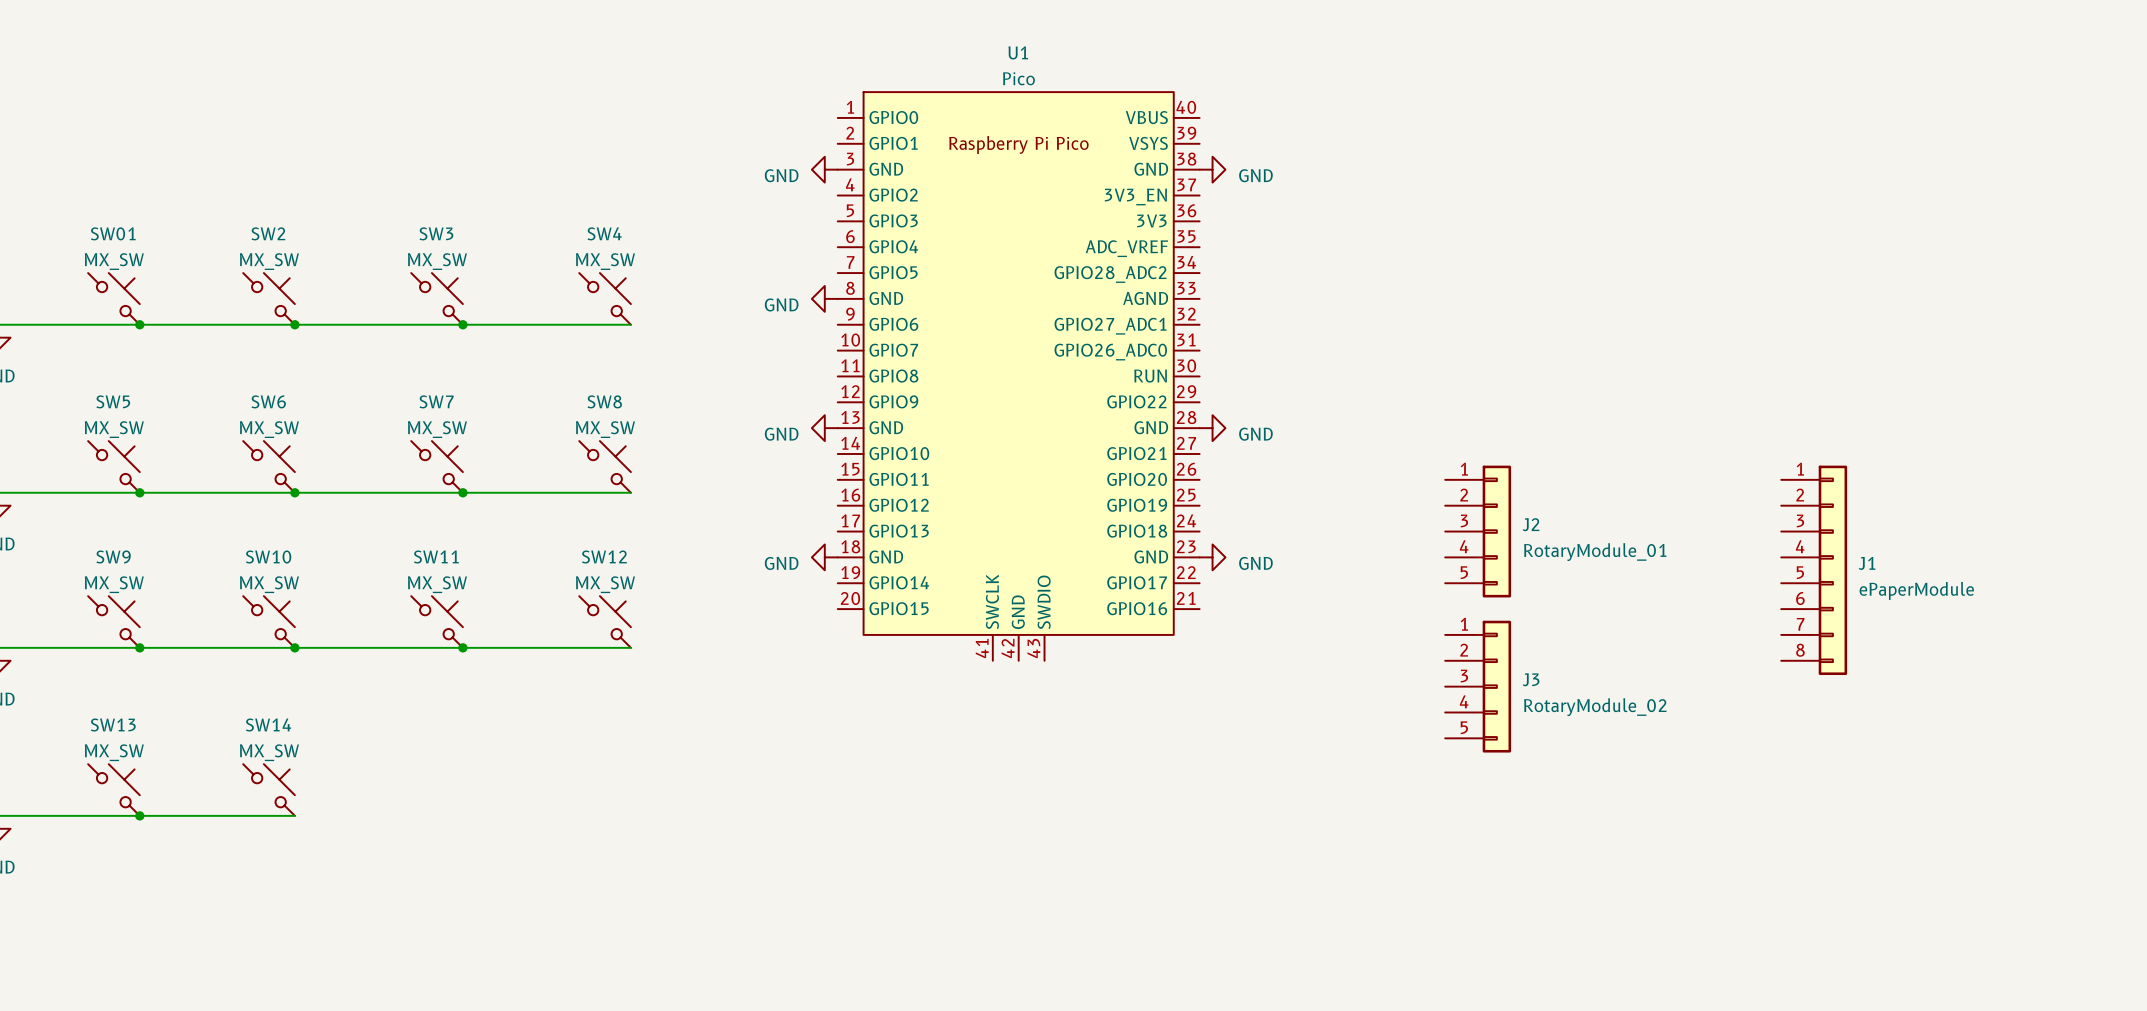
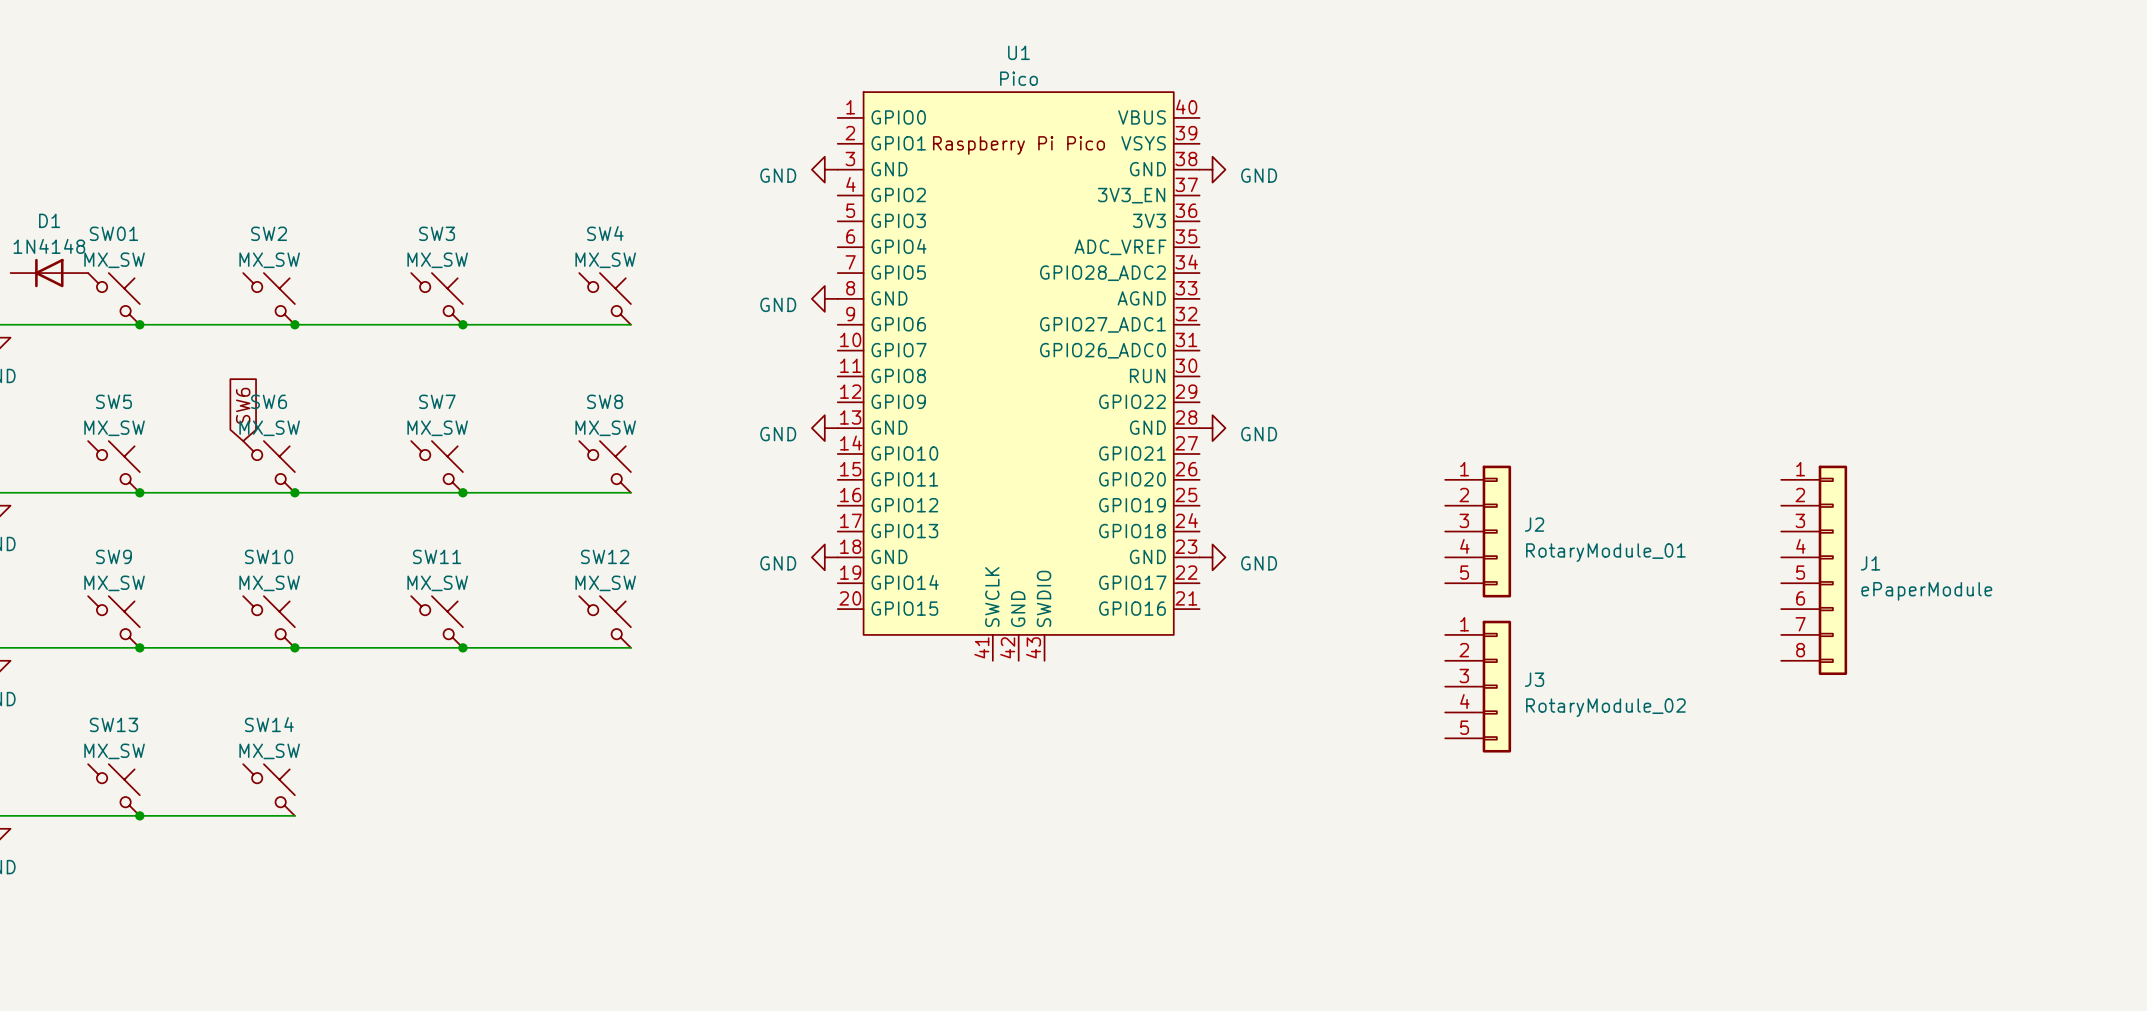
D1: none -> 1N4148 (49, 273)
global label: none -> SW6 (243, 405)

